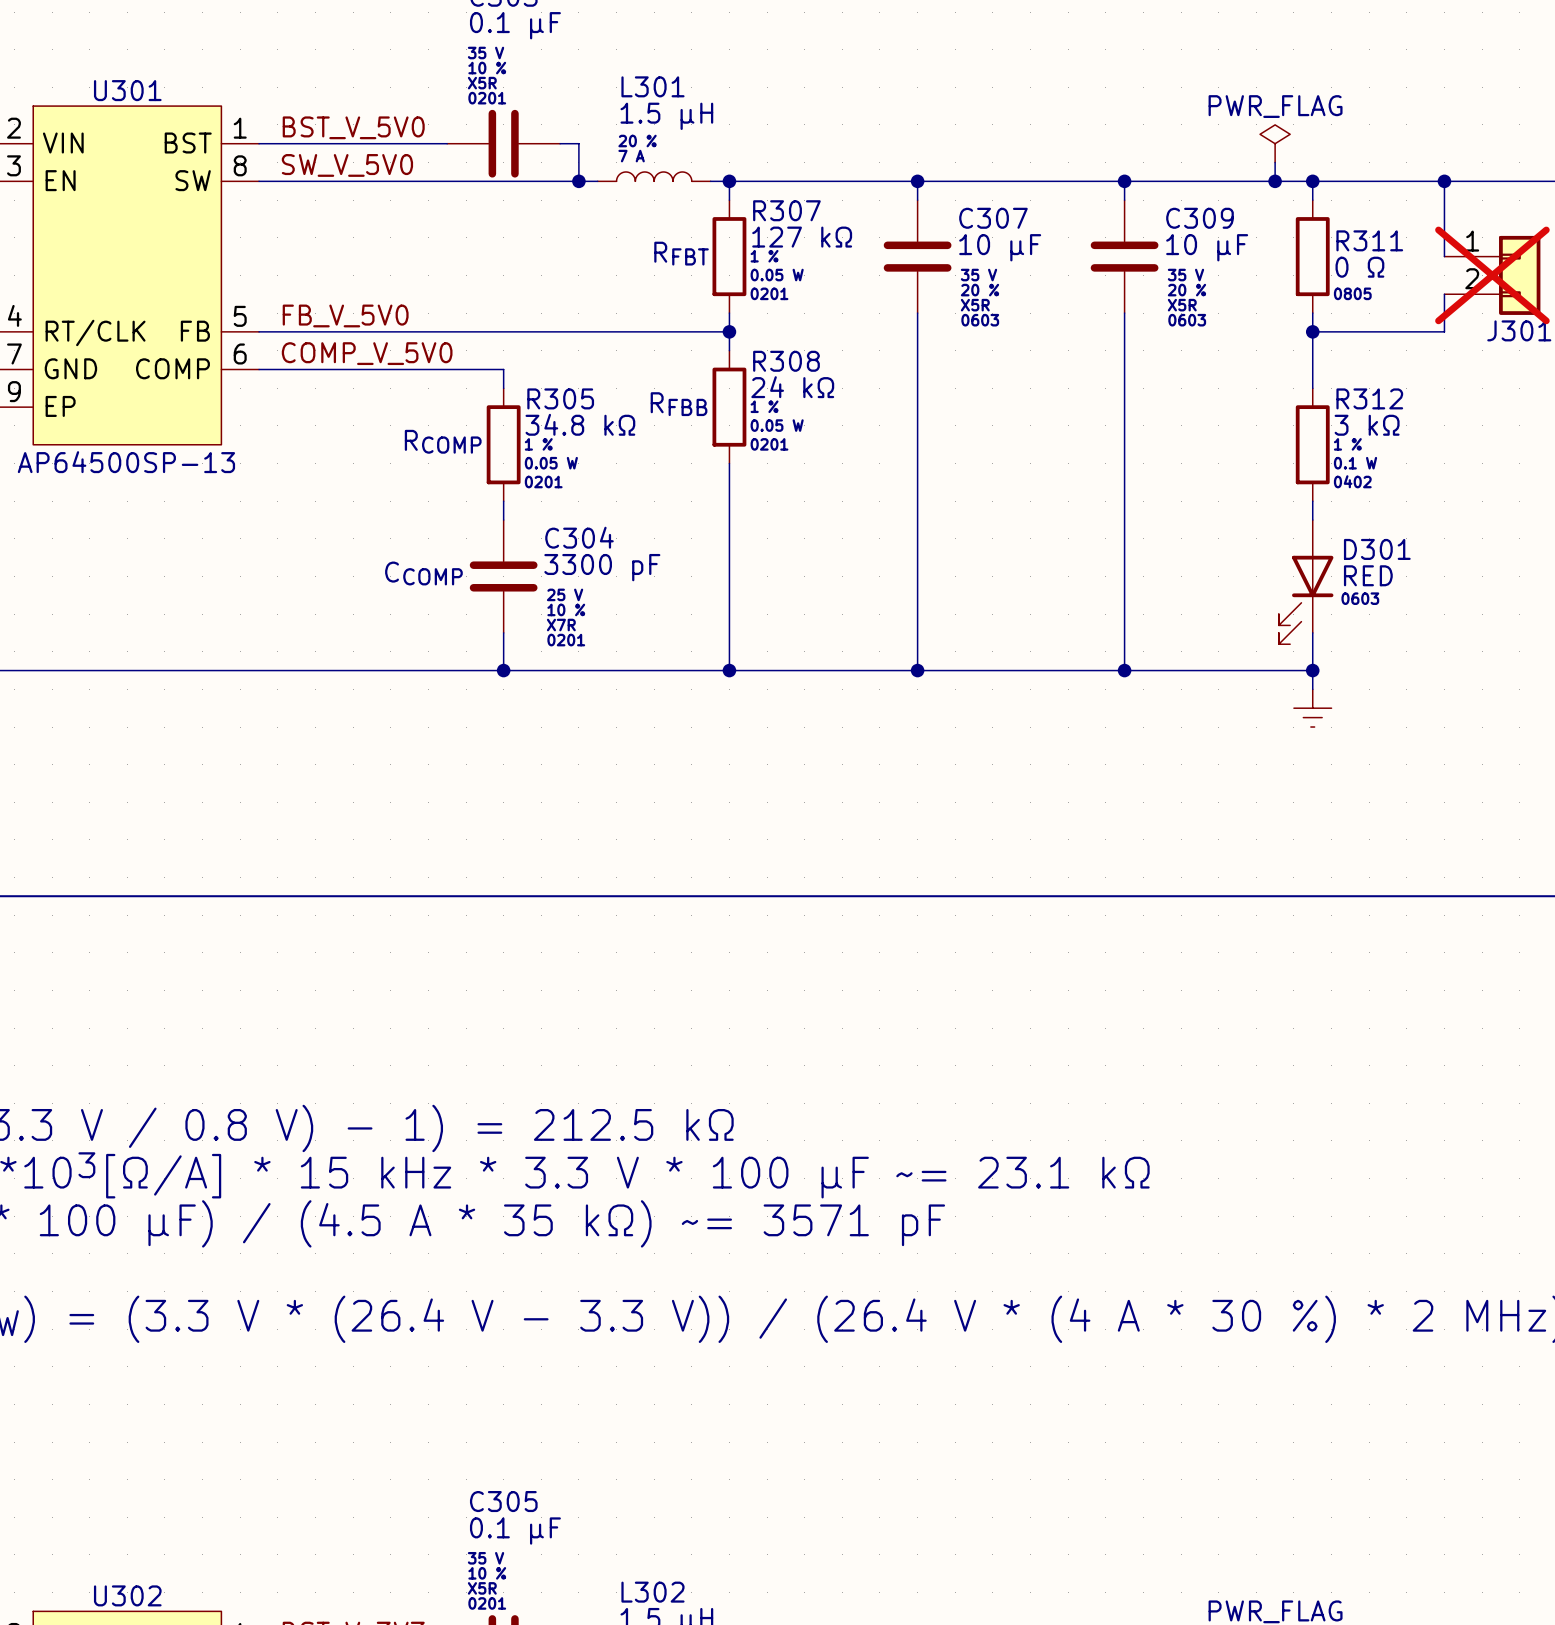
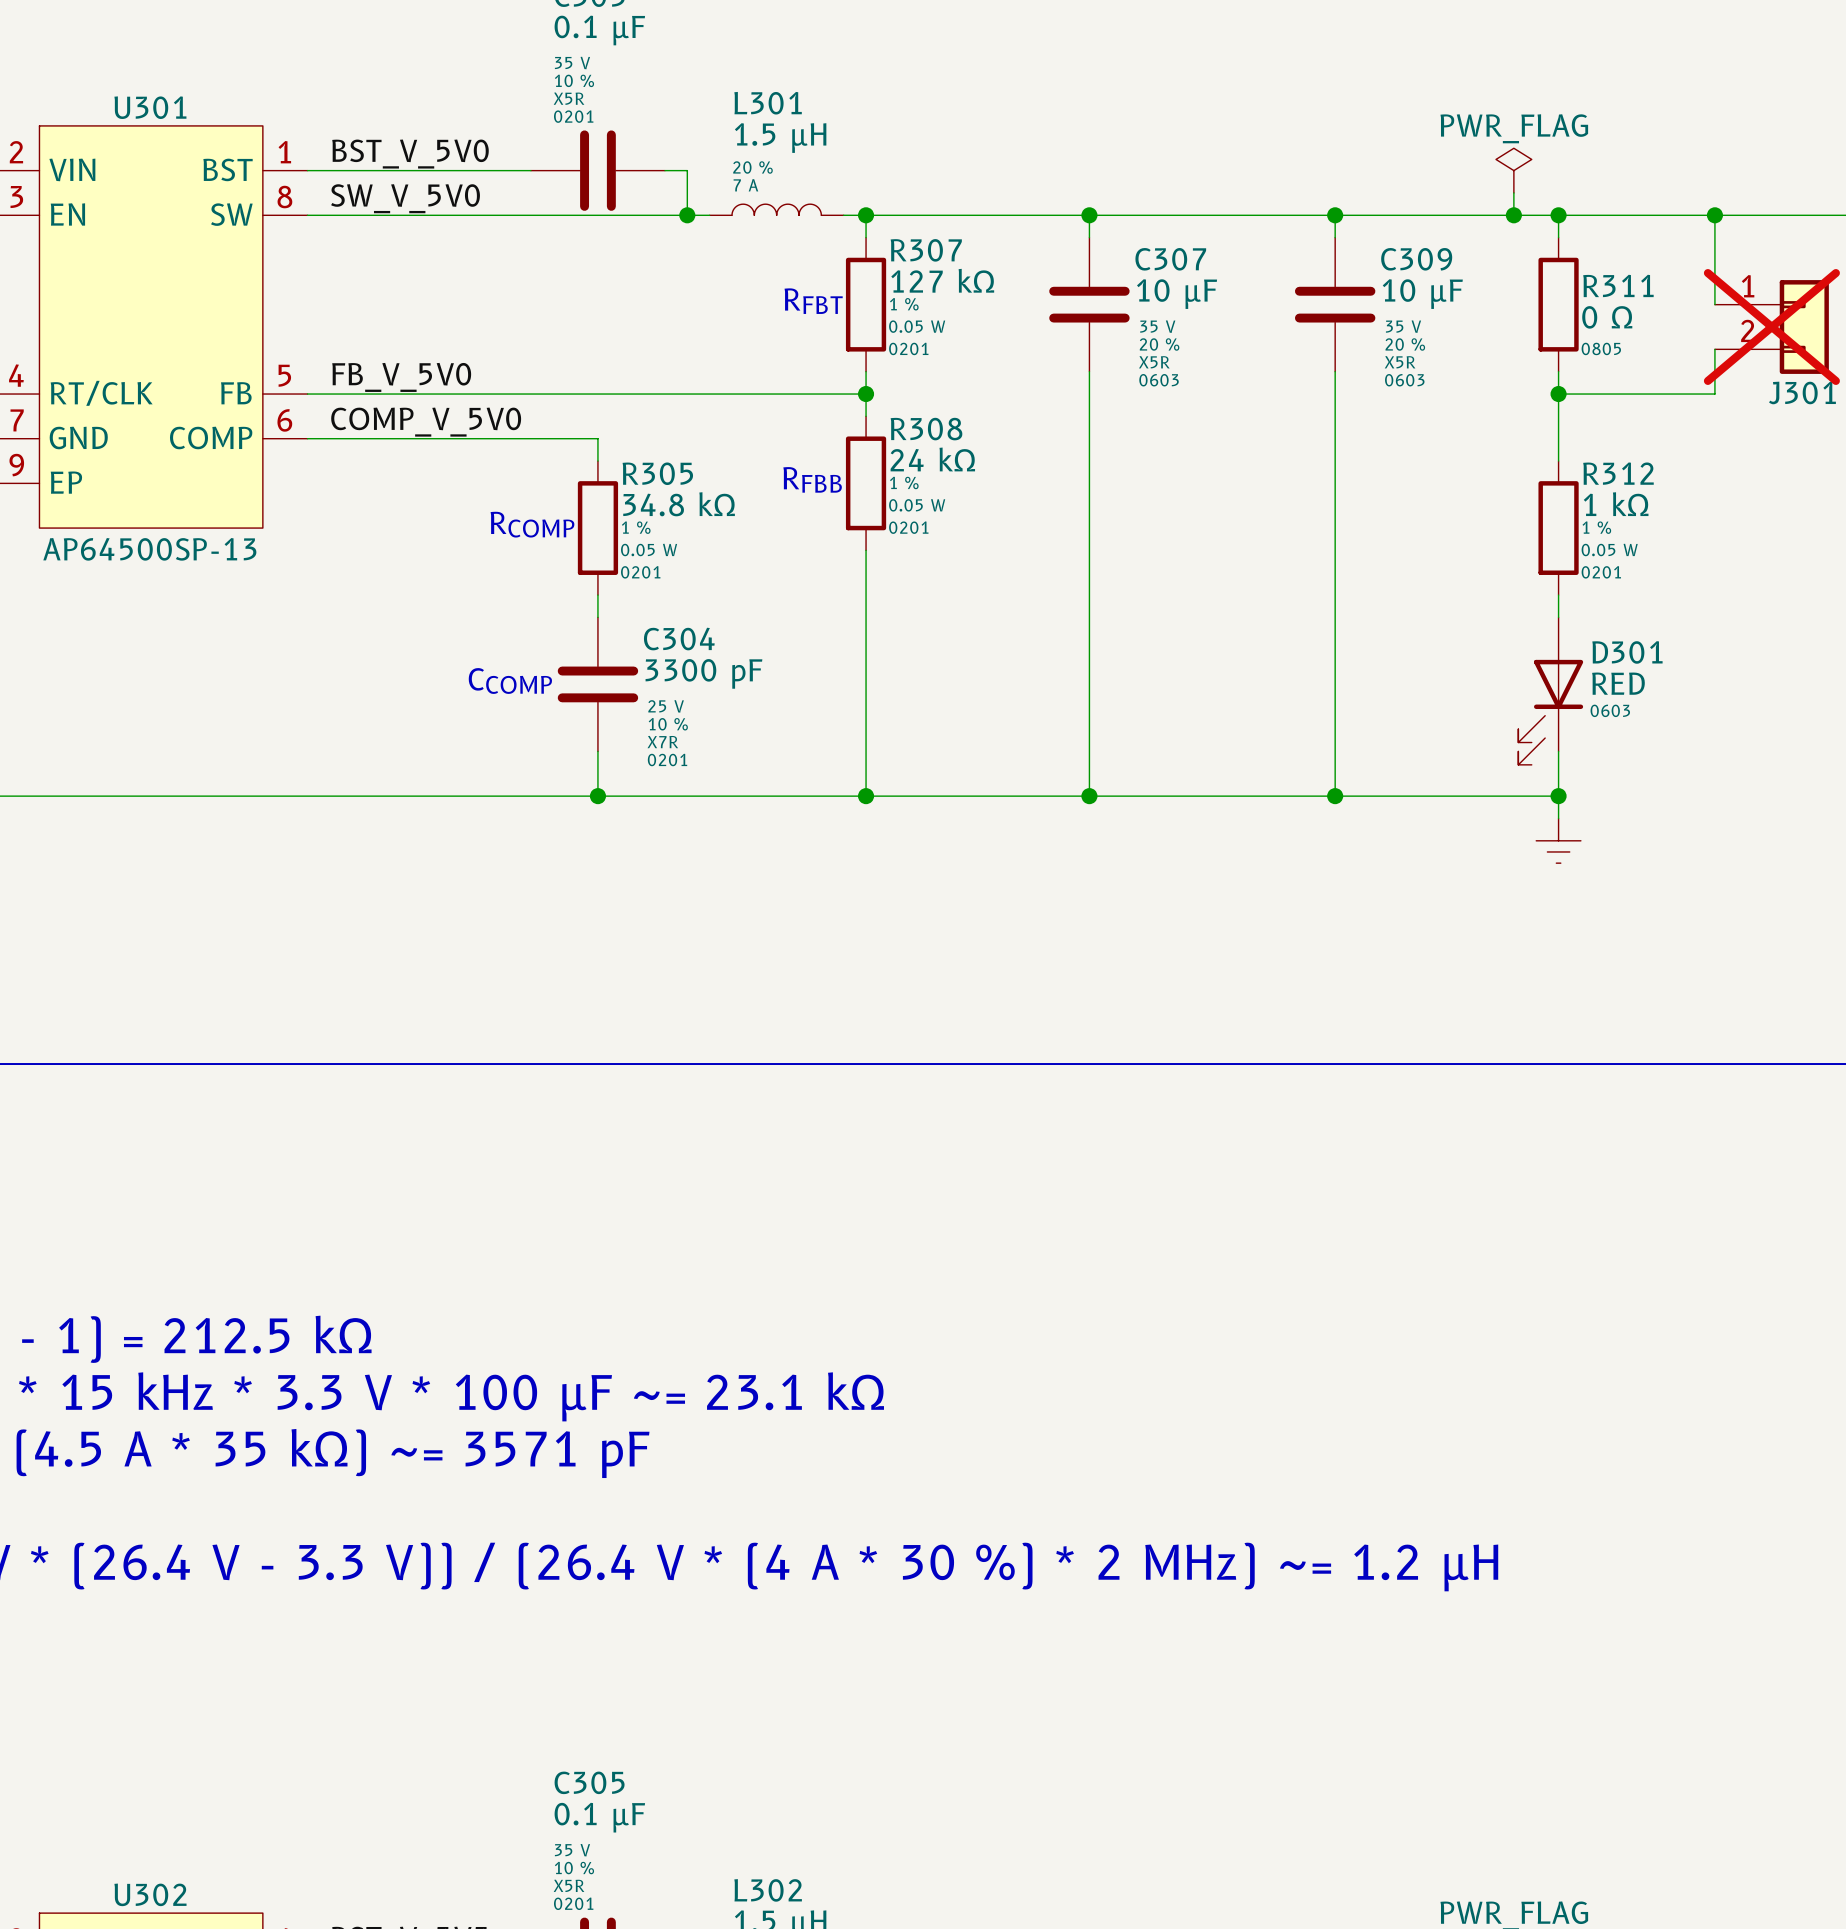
R312 value: 3 kΩ (1367, 425) -> 1 kΩ (1616, 504)
R312 text: 0.1 W (1355, 463) -> 0.05 W (1609, 550)
R312 text: 0402 (1352, 481) -> 0201 (1601, 572)

